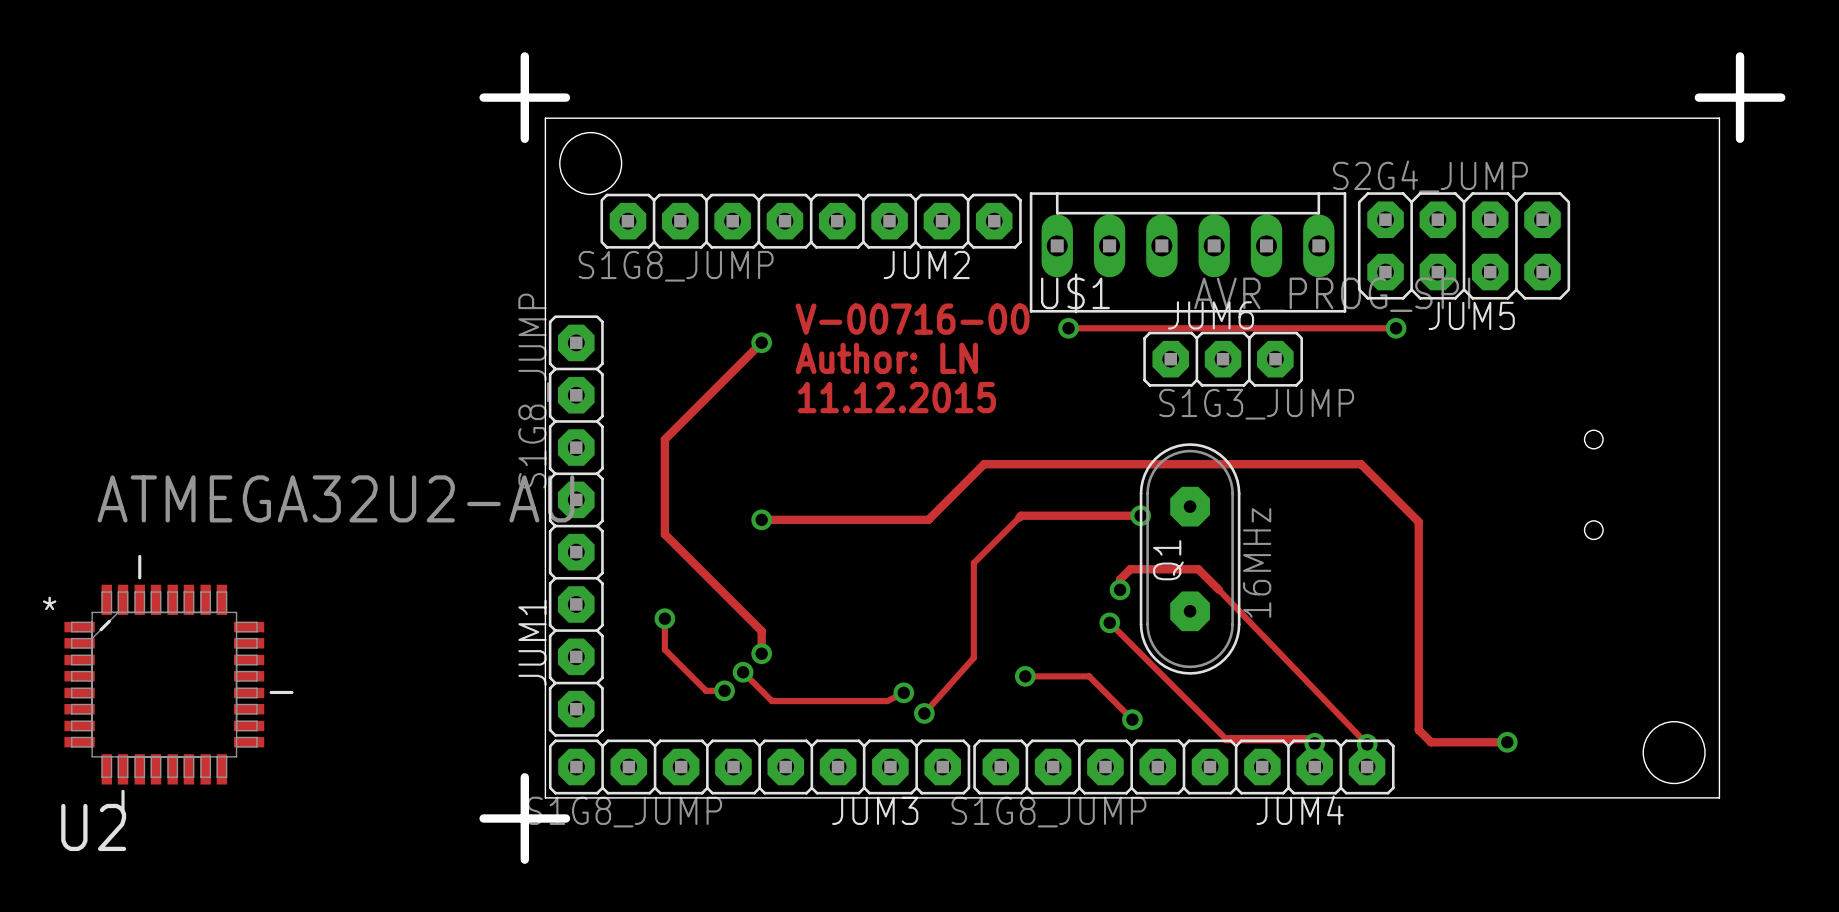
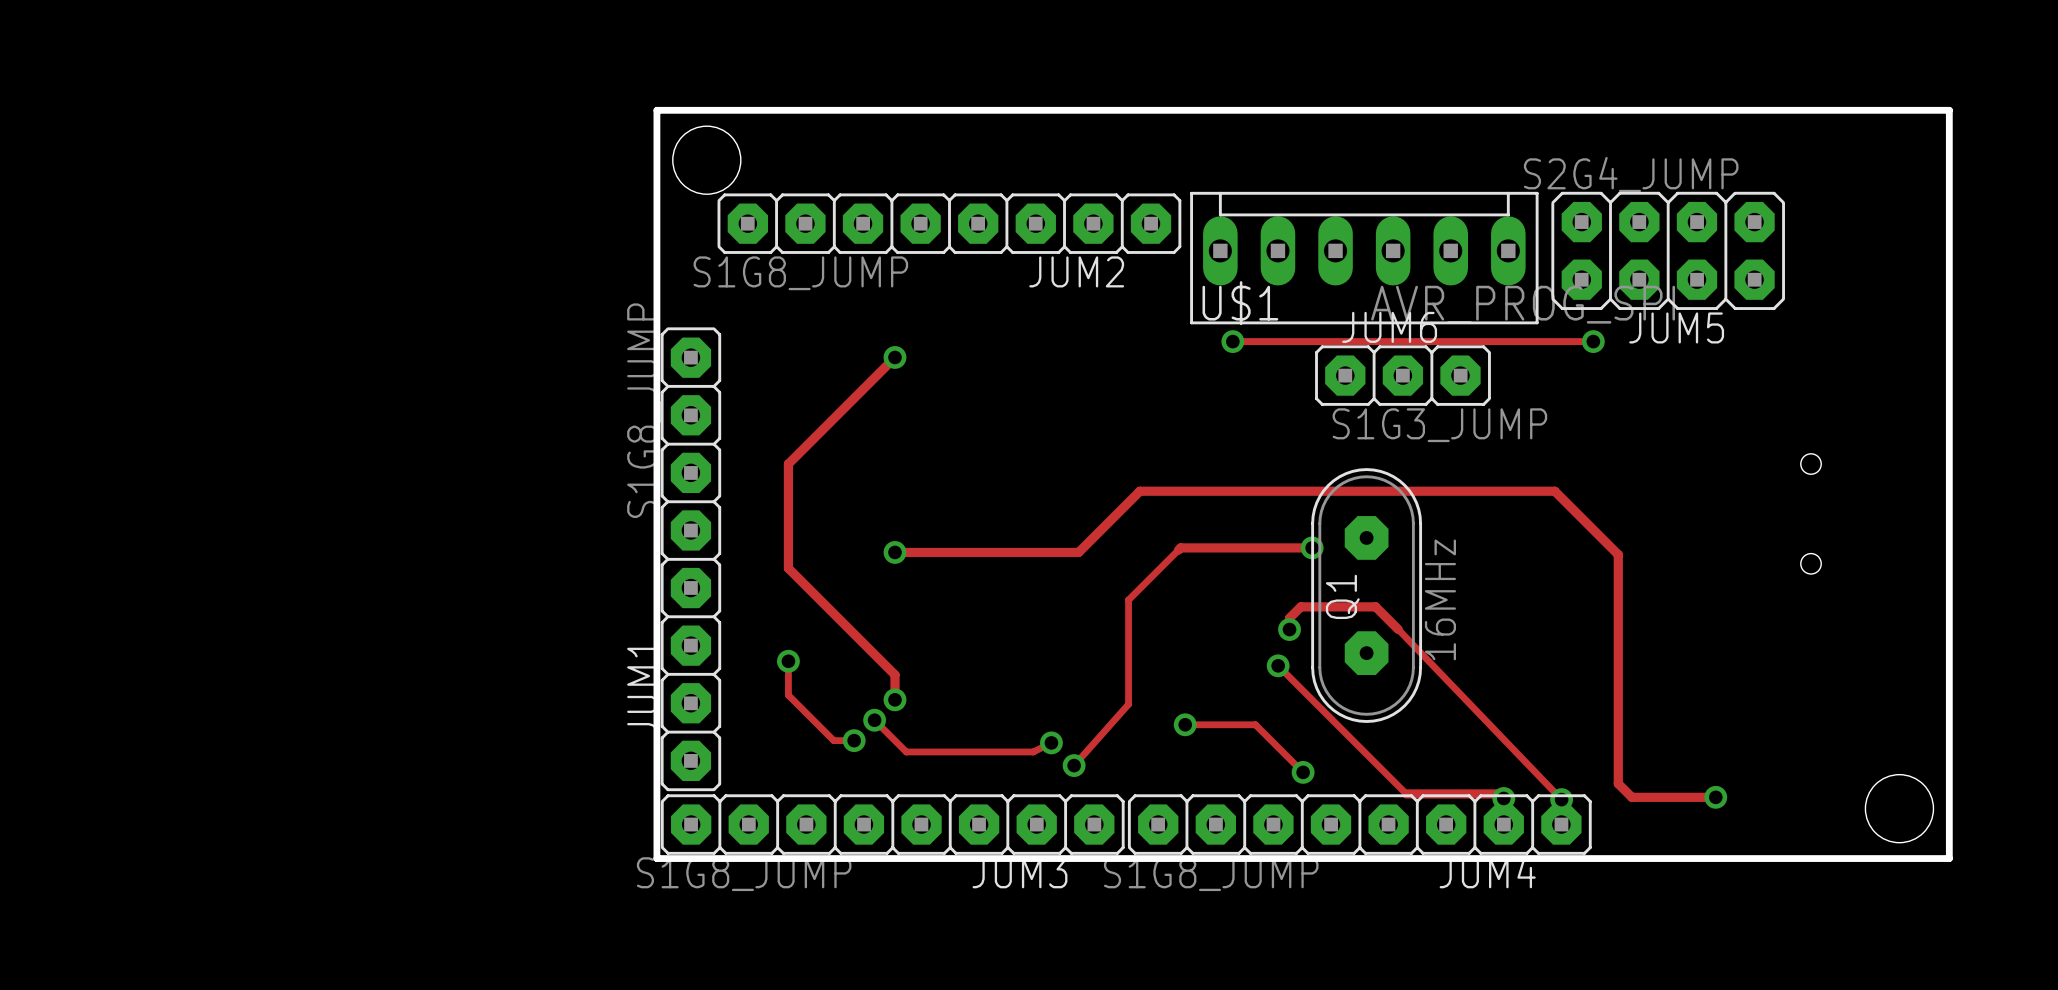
board edge: (524, 56) (524, 138) -> none
board edge: (1740, 56) (1740, 138) -> none
board edge: (483, 97) (565, 97) -> none
board edge: (1698, 97) (1781, 97) -> none
board edge width: thin (545, 118) (1719, 118) (1719, 797) (545, 797) (545, 118) -> thick (656, 110) (1949, 110) (1949, 858) (656, 858) (656, 110)
text: V-00716-00 (912, 319) -> none
text: Author: LN (886, 358) -> none
text: 11.12.2015 (896, 397) -> none
U2: ATMEGA32U2-AU (178, 684) -> none
board edge: (524, 777) (524, 859) -> none
board edge: (483, 818) (565, 818) -> none

